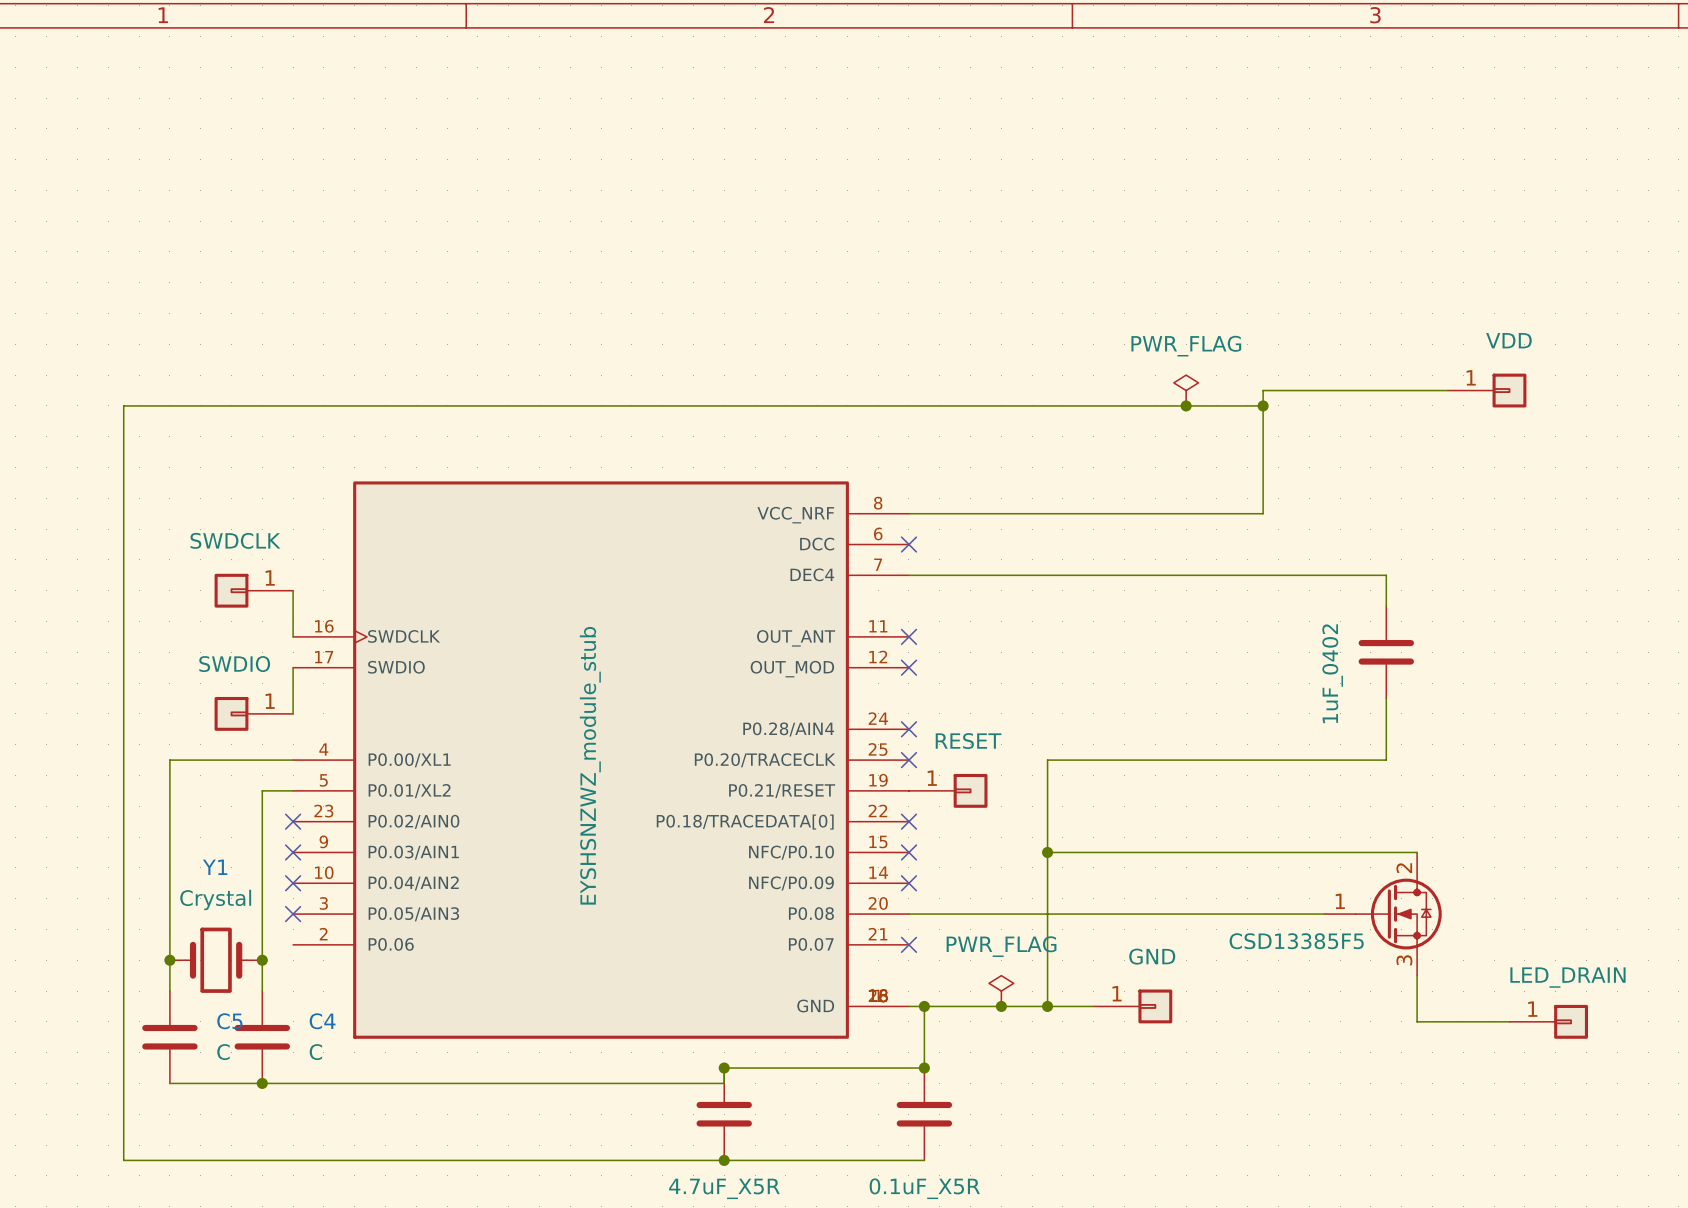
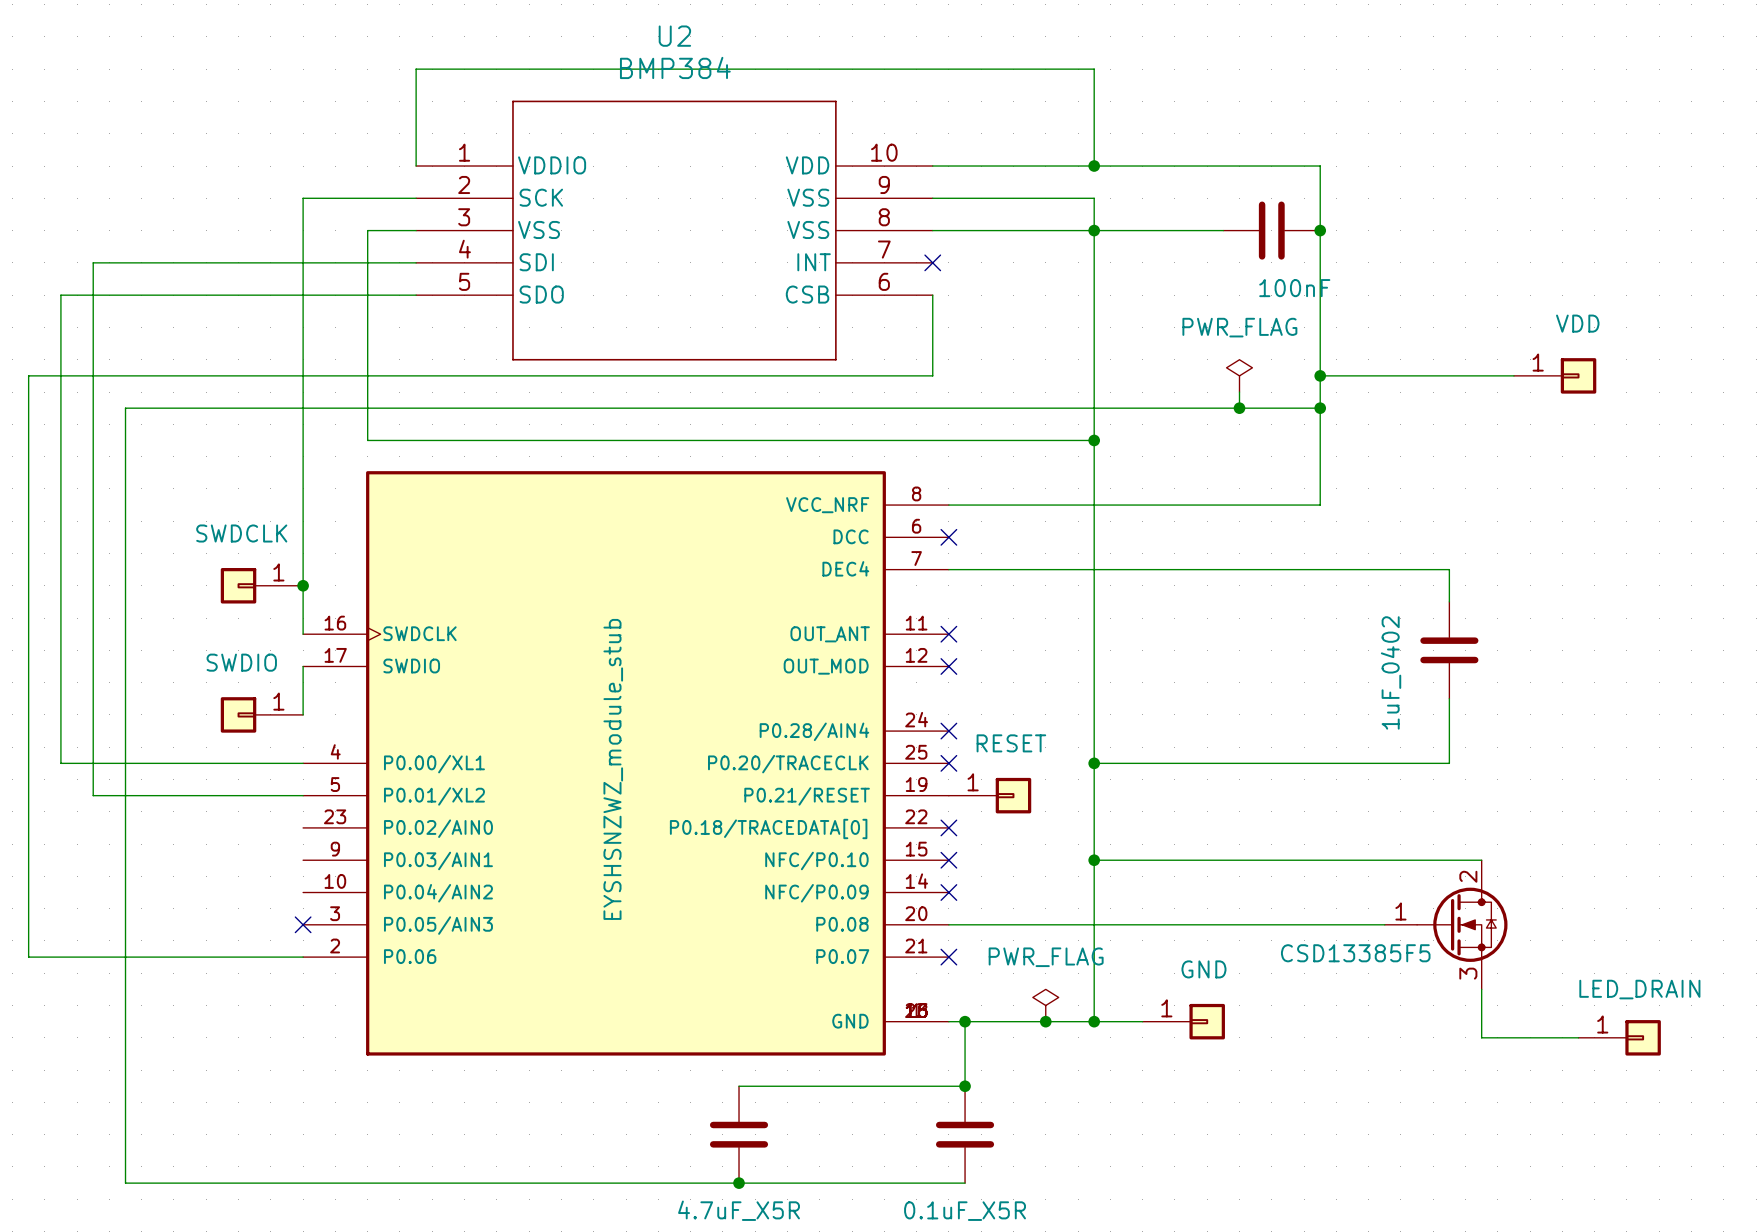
wire: none -> (416, 166) (416, 69) (1094, 69) (1094, 166)
wire: none -> (932, 166) (1320, 166) (1320, 375)
junction: none -> (1094, 166)
wire: none -> (416, 198) (303, 198) (303, 585)
wire: none -> (932, 198) (1094, 198) (1094, 763)
wire: none -> (416, 230) (367, 230) (367, 440) (1094, 440)
U2: none -> BMP384 (674, 230)
wire: none -> (932, 230) (1223, 230)
junction: none -> (1094, 230)
part: none -> 100nF (1271, 230)
junction: none -> (1320, 230)
no-connect mark: none -> (932, 262)
wire: none -> (932, 295) (932, 375) (28, 375) (28, 957) (303, 957)
junction: none -> (1320, 375)
wire: none -> (1239, 392) (1239, 408)
junction position: (1186, 405) -> (1239, 408)
wire: (1263, 405) (123, 405) (123, 421) -> (1320, 408) (125, 408)
junction: (1263, 405) -> none
junction: none -> (1320, 408)
junction: none -> (1094, 440)
junction: none -> (303, 585)
wire: (169, 760) (169, 991) -> (173, 763) (60, 763) (60, 295) (416, 295)
junction: none -> (1094, 763)
wire: (262, 790) (262, 991) -> (270, 795) (93, 795) (93, 262) (416, 262)
no-connect mark: (293, 821) -> none
no-connect mark: (293, 852) -> none
no-connect mark: (293, 883) -> none
junction: (169, 960) -> none
Y1: Crystal (216, 960) -> none
junction: (262, 960) -> none
C5: C (169, 1037) -> none
C4: C (262, 1037) -> none
wire: (724, 1068) (724, 1083) (169, 1083) -> (755, 1086) (739, 1086)
junction: (724, 1068) -> none
junction: (262, 1083) -> none
part position: (724, 1114) -> (739, 1134)
junction position: (724, 1160) -> (739, 1183)

